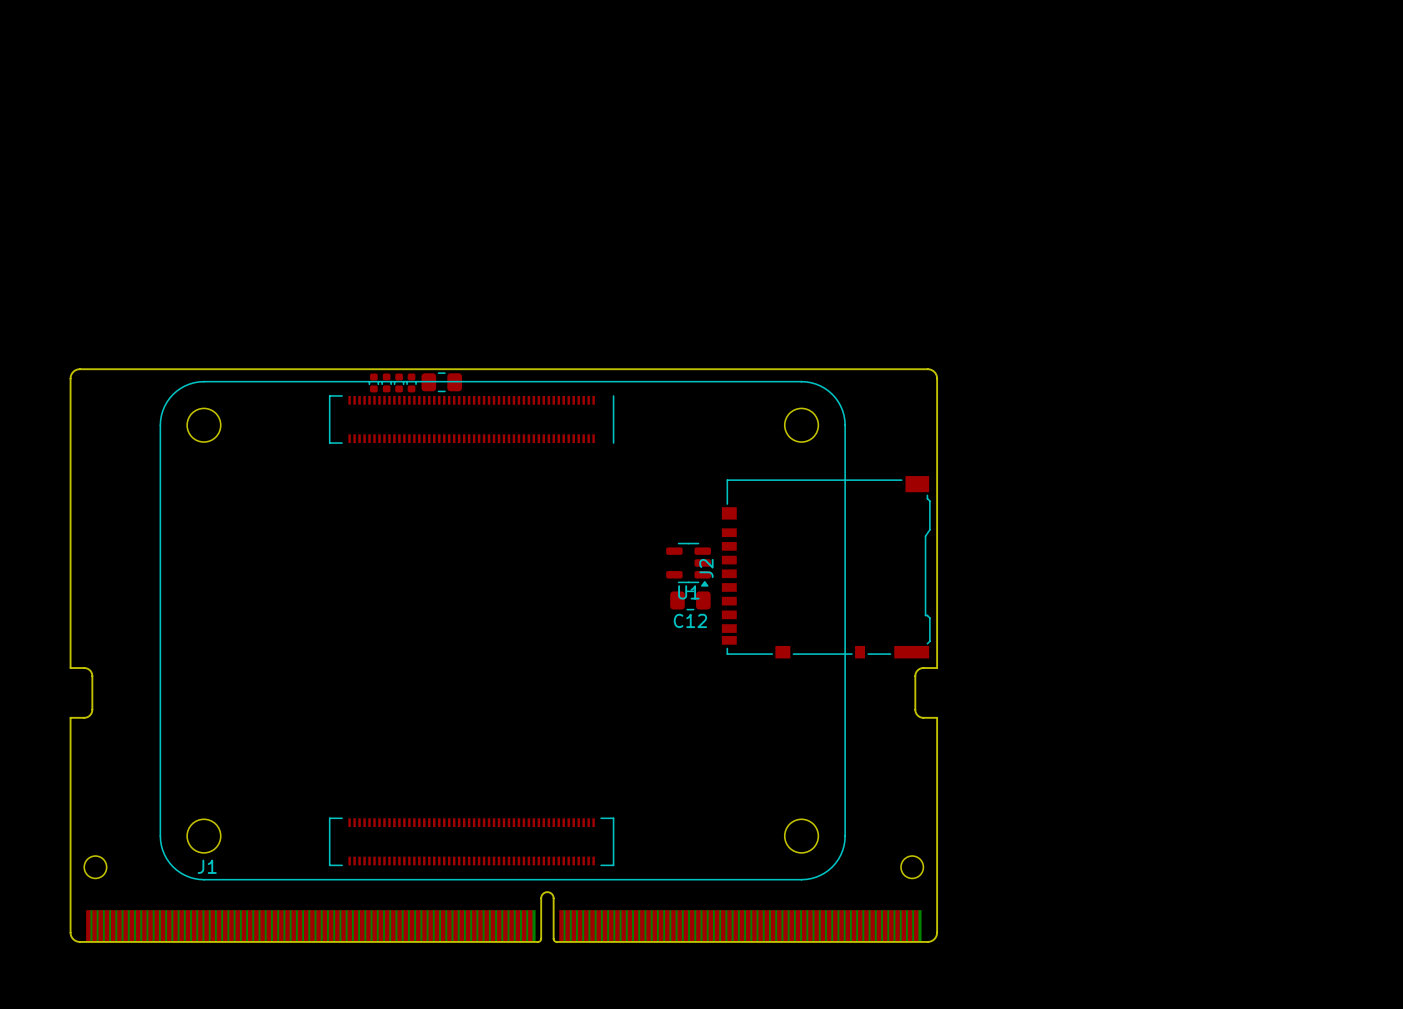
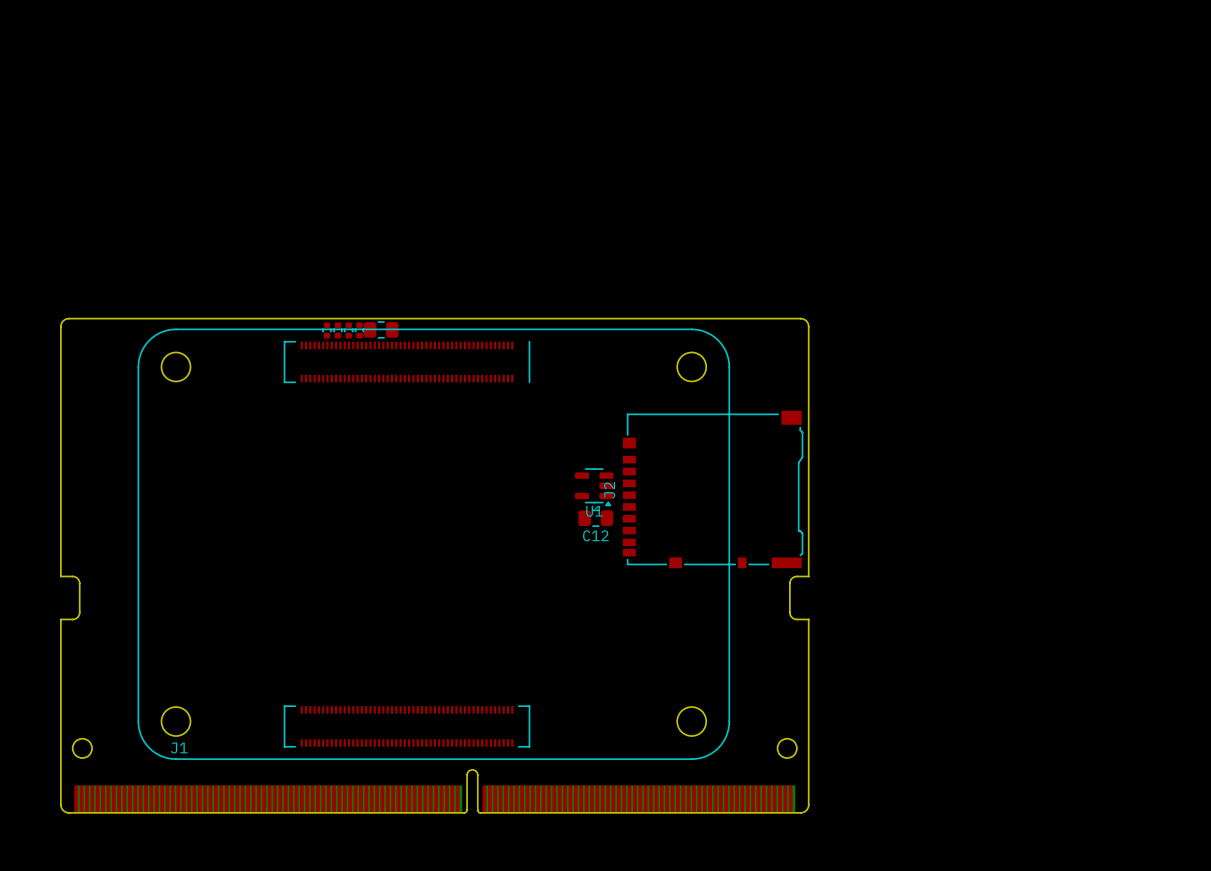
part: (373, 382) -> none
part: none -> (326, 330)
part: (386, 382) -> none
part: none -> (337, 330)
part: (399, 382) -> none
part: none -> (348, 330)
part: (411, 382) -> none
part: none -> (359, 330)

